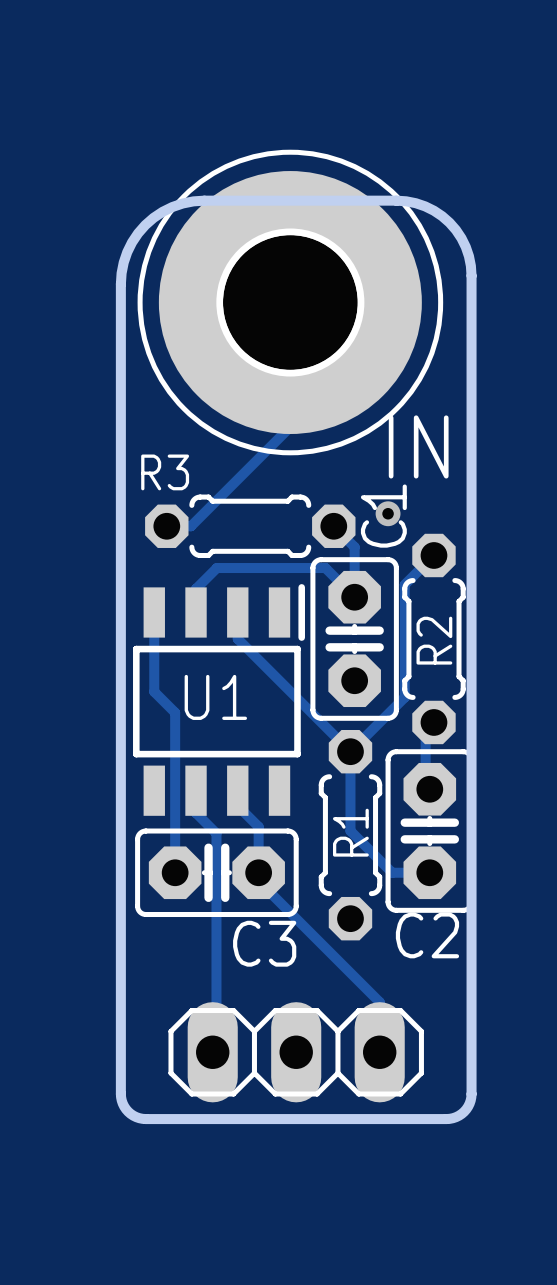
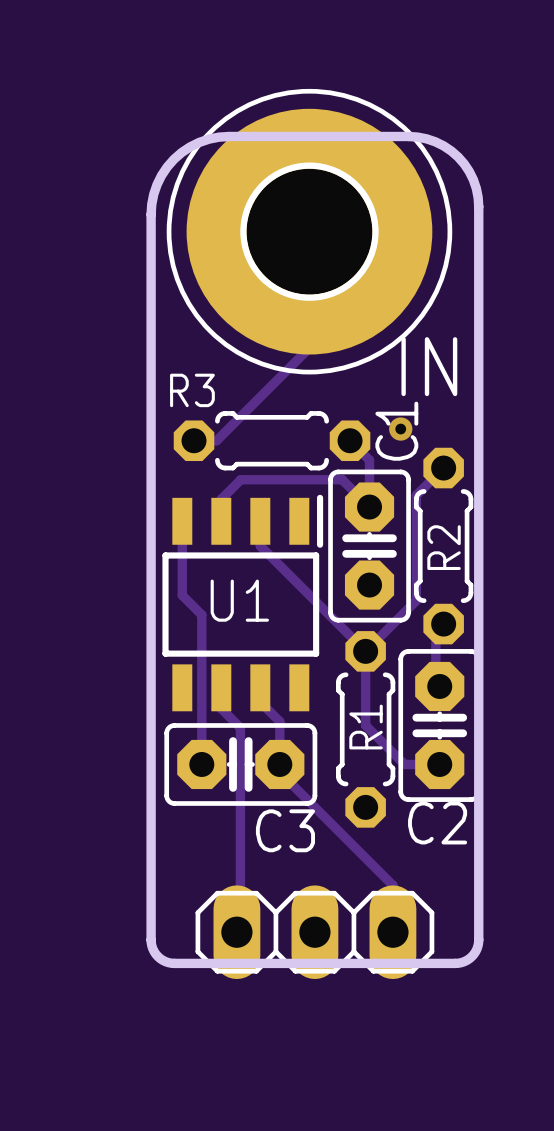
board edge: (120, 1060) (122, 1103) (133, 1115) (145, 1119) (449, 1118) (461, 1113) (469, 1103) (471, 1060) -> (151, 940) (152, 948) (157, 956) (165, 961) (174, 963) (458, 963) (467, 960) (473, 954) (478, 940)

